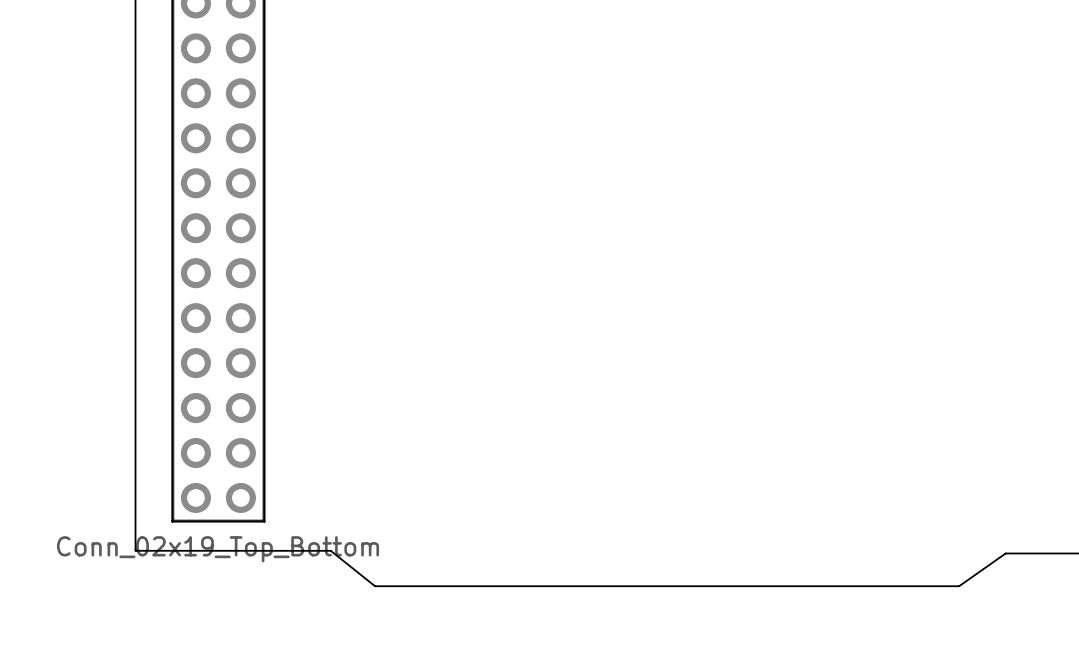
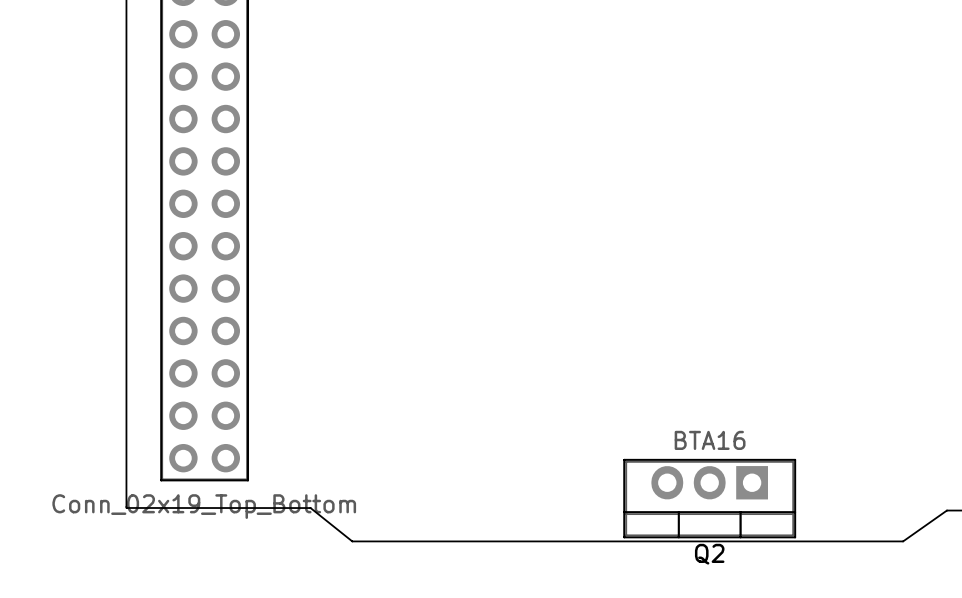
Q2: none -> BTA16 (709, 498)

